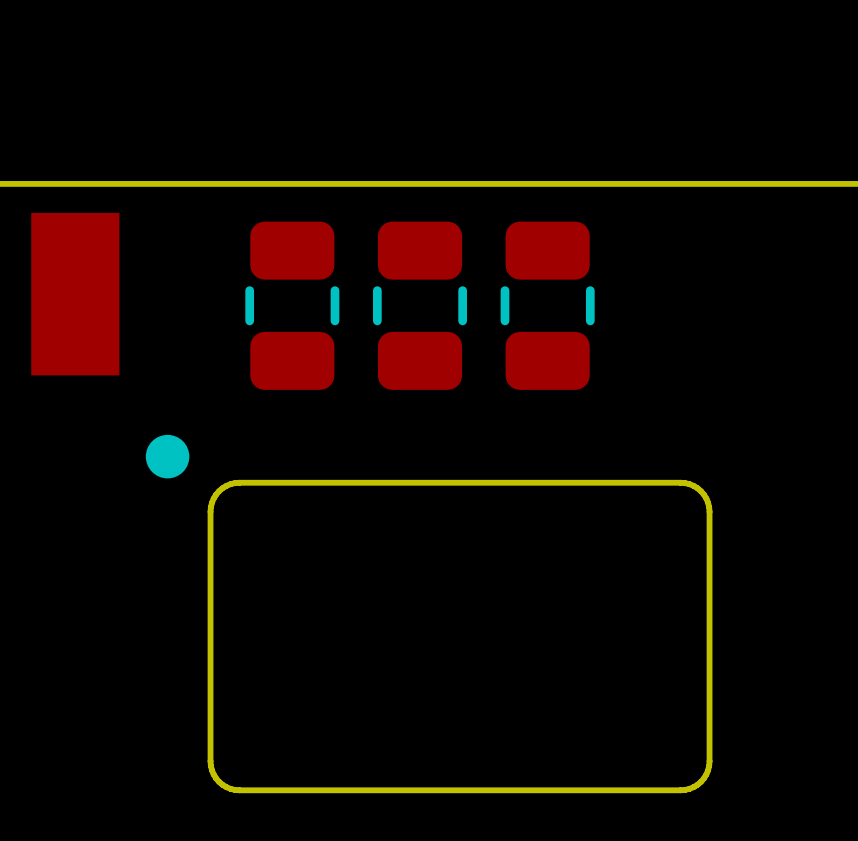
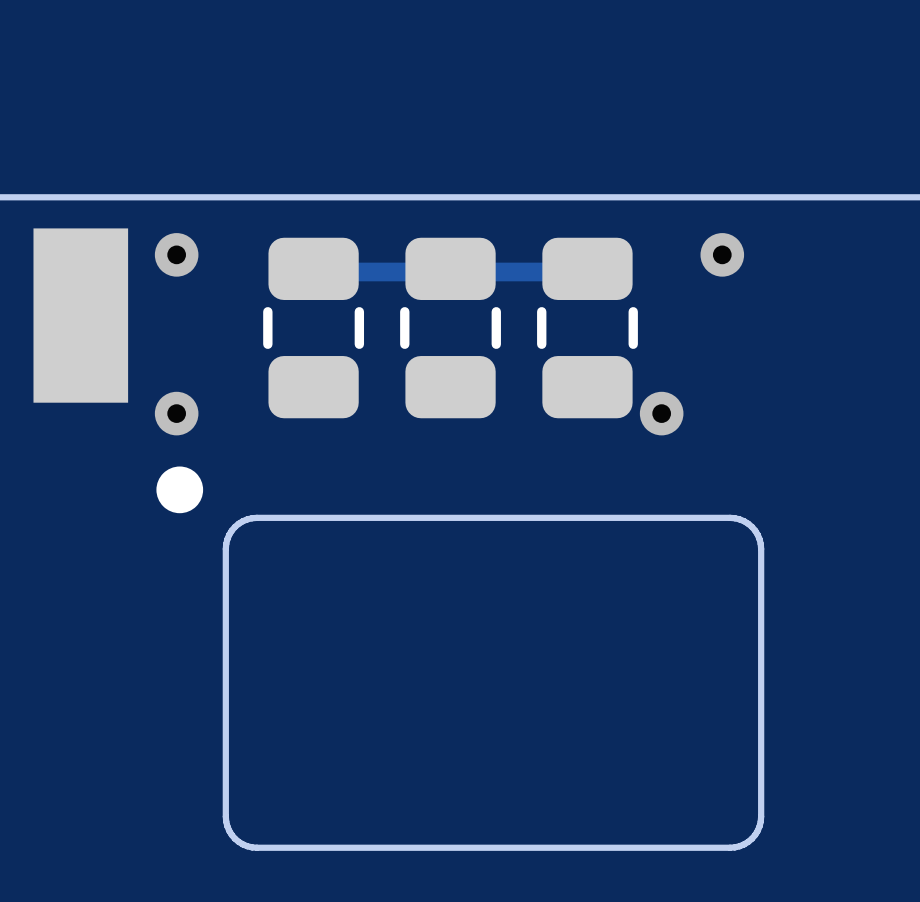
via: none -> (176, 254)
via: none -> (722, 254)
track: none -> (350, 271) (413, 271)
track: none -> (487, 271) (550, 271)
via: none -> (176, 413)
via: none -> (661, 413)

